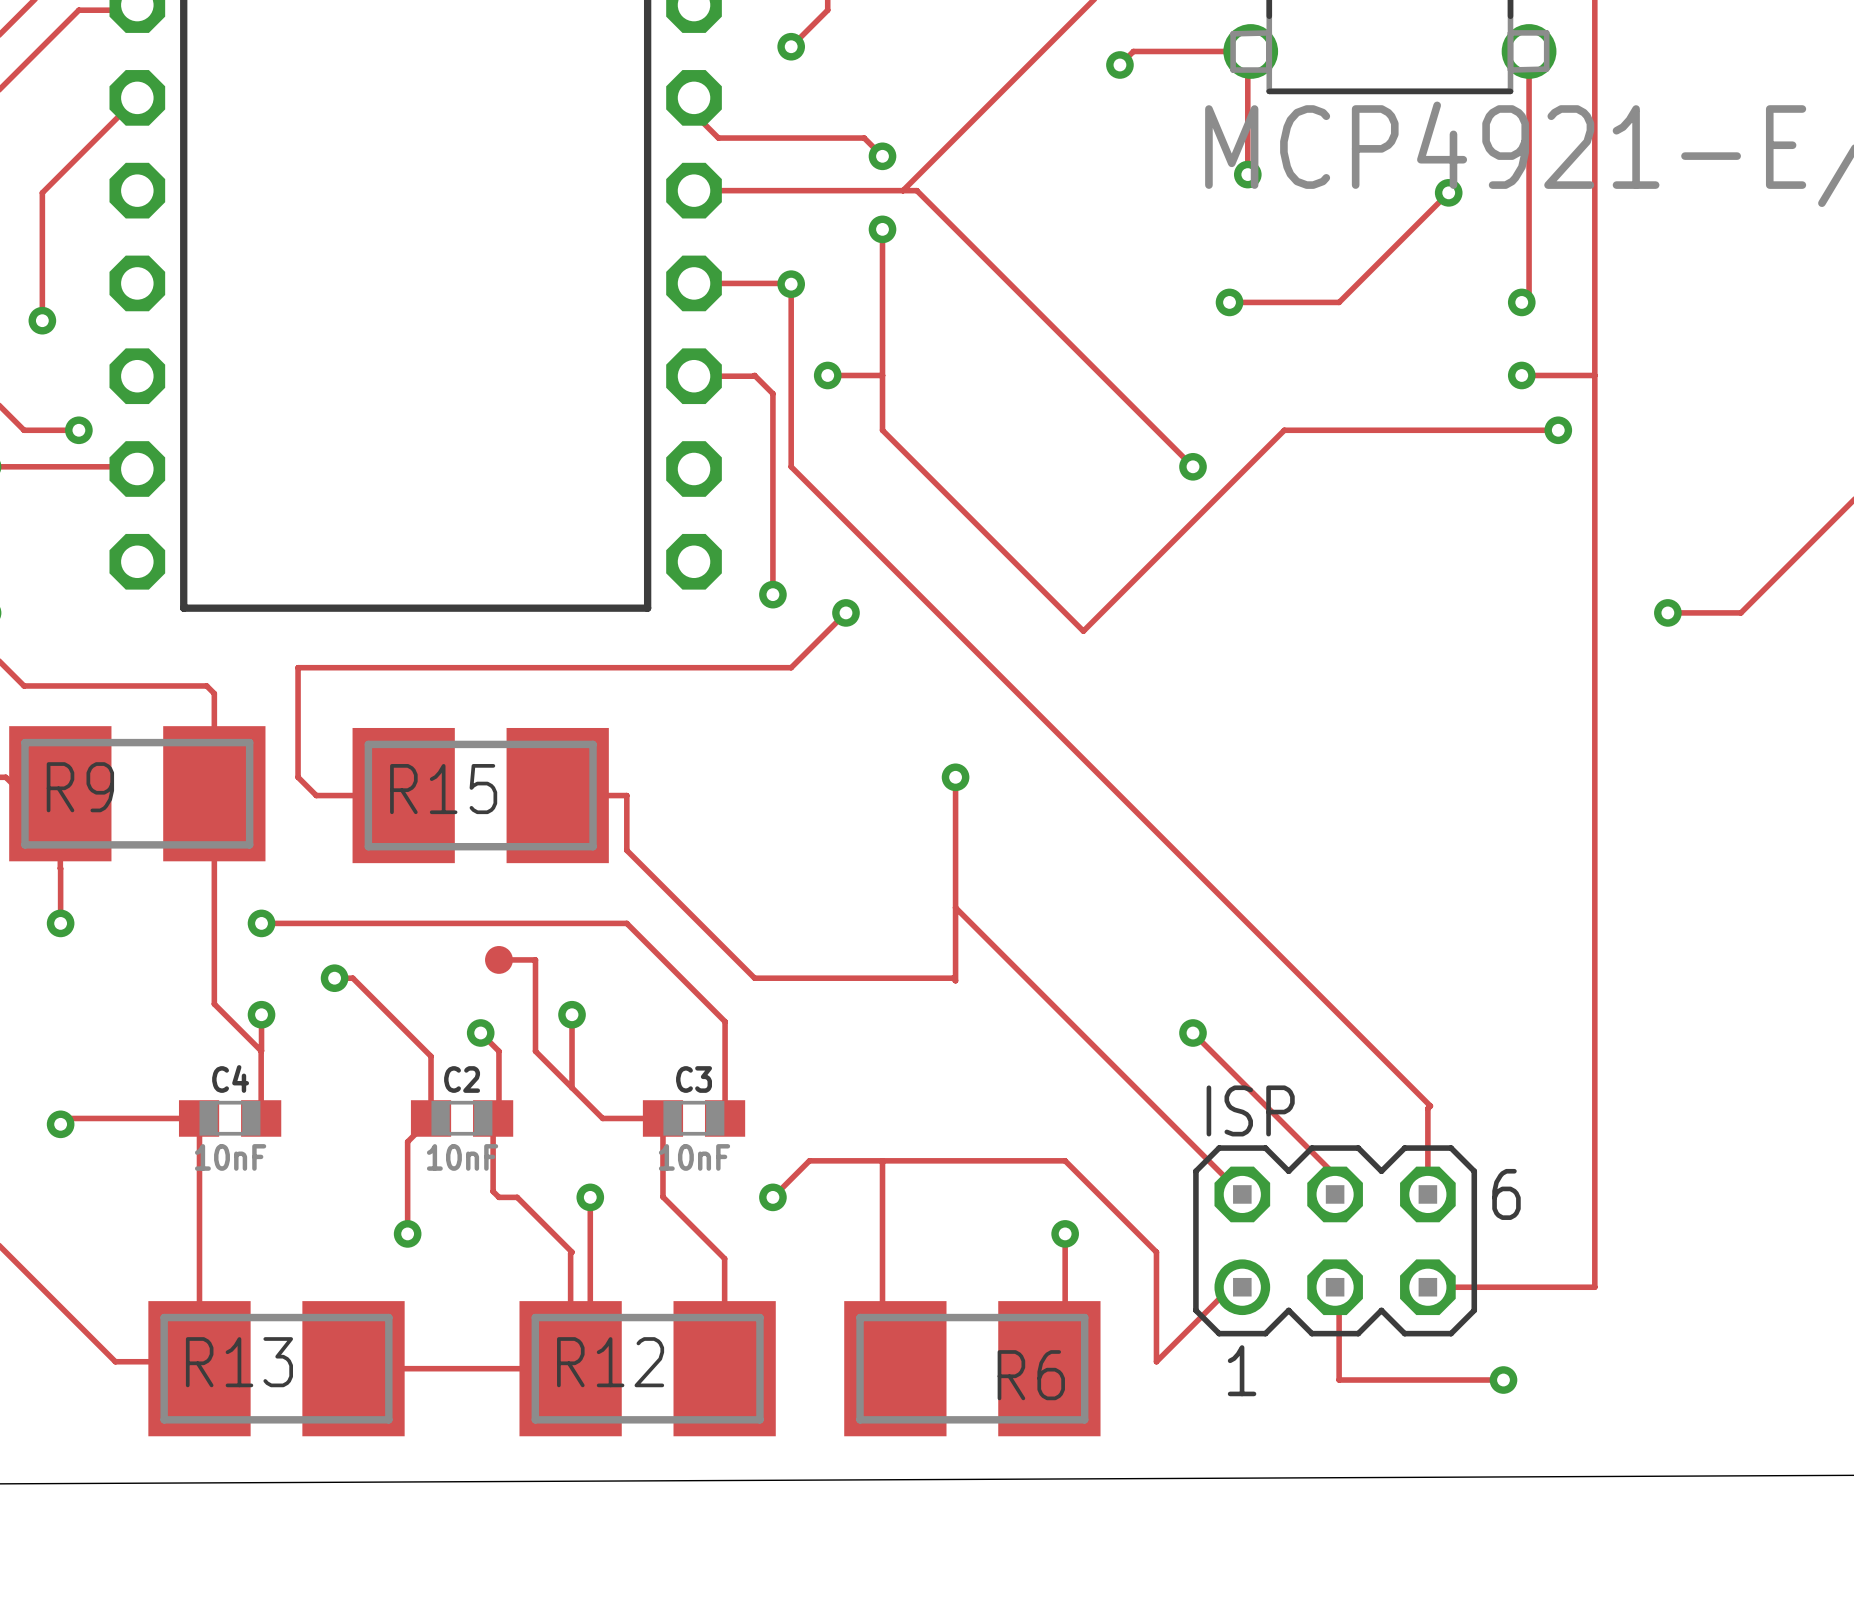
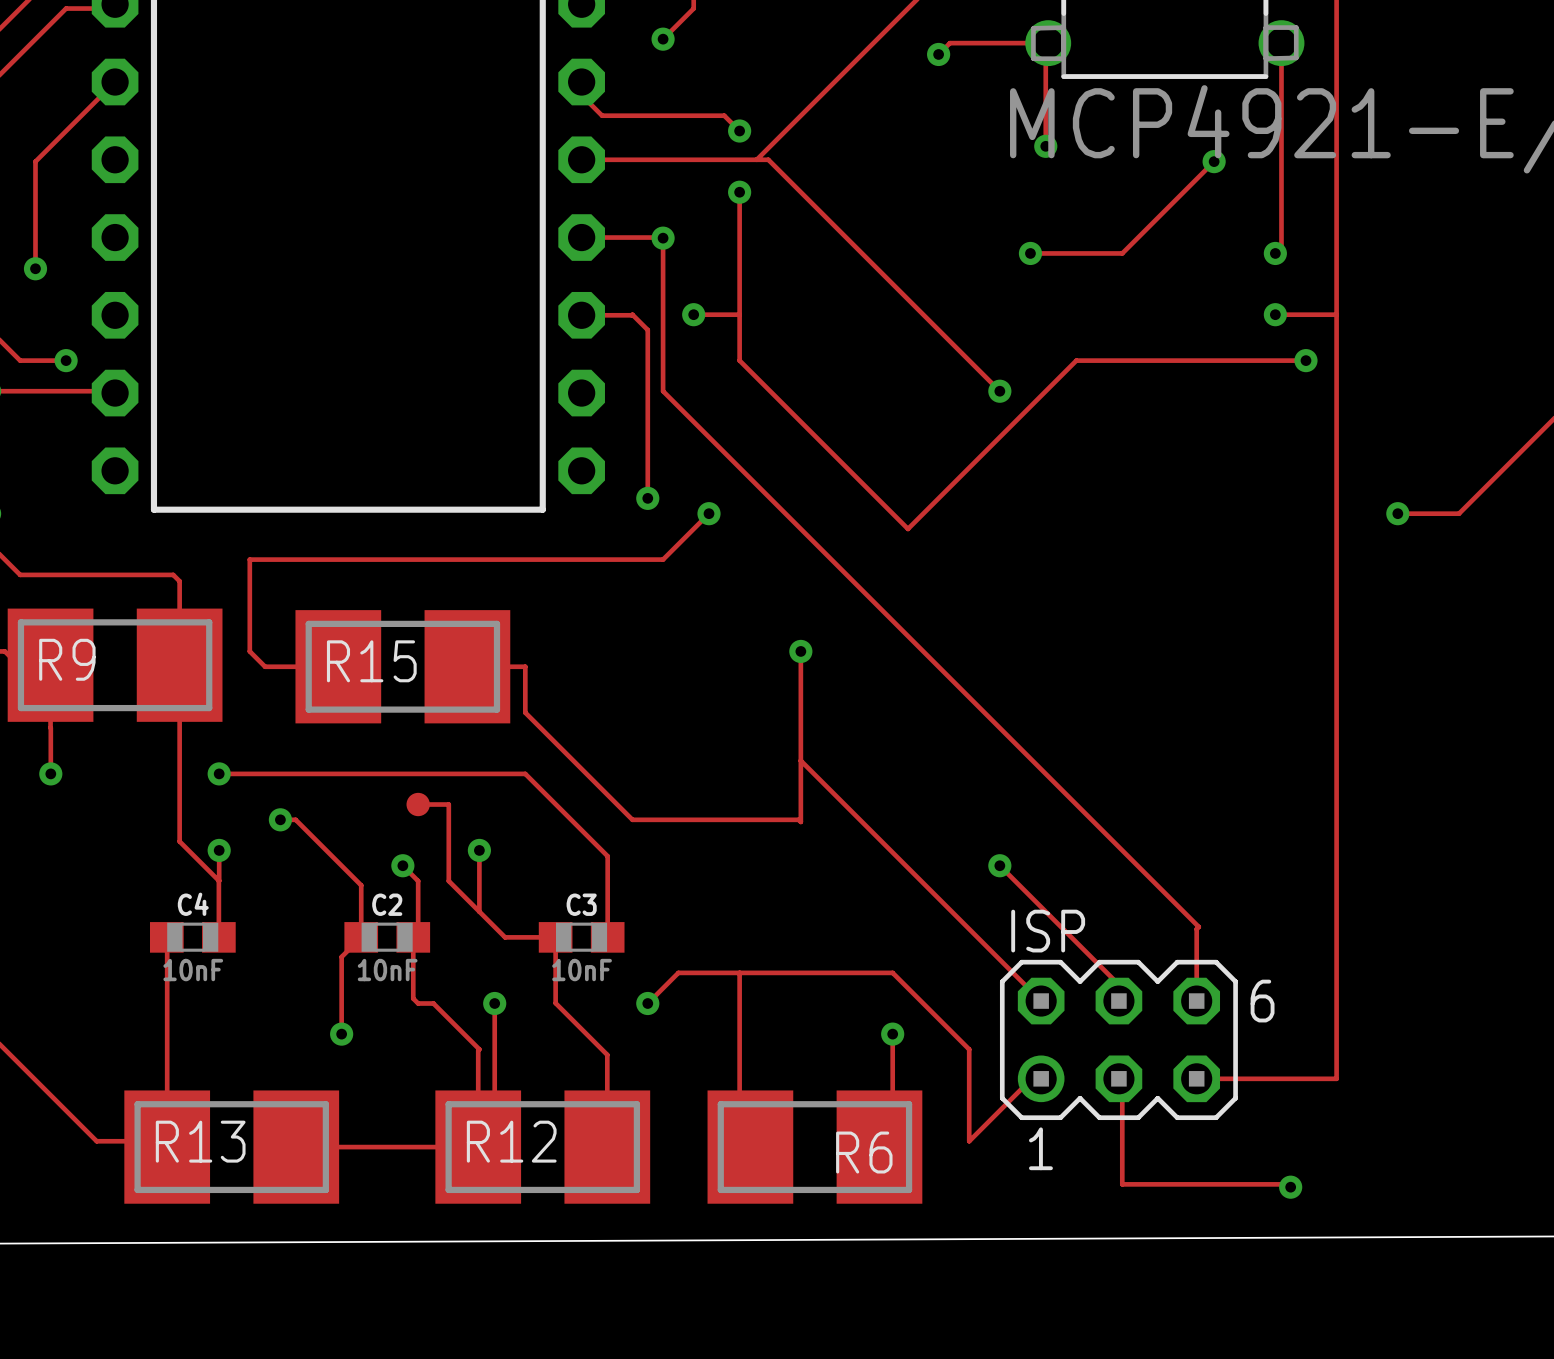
track: (199, 1118) (66, 1118) (60, 1124) -> none
via: (60, 1124) -> none
track: (1339, 1380) (1503, 1380) -> (1122, 1156) (1122, 1184) (1287, 1184) (1290, 1187)
via position: (1503, 1380) -> (1290, 1187)

